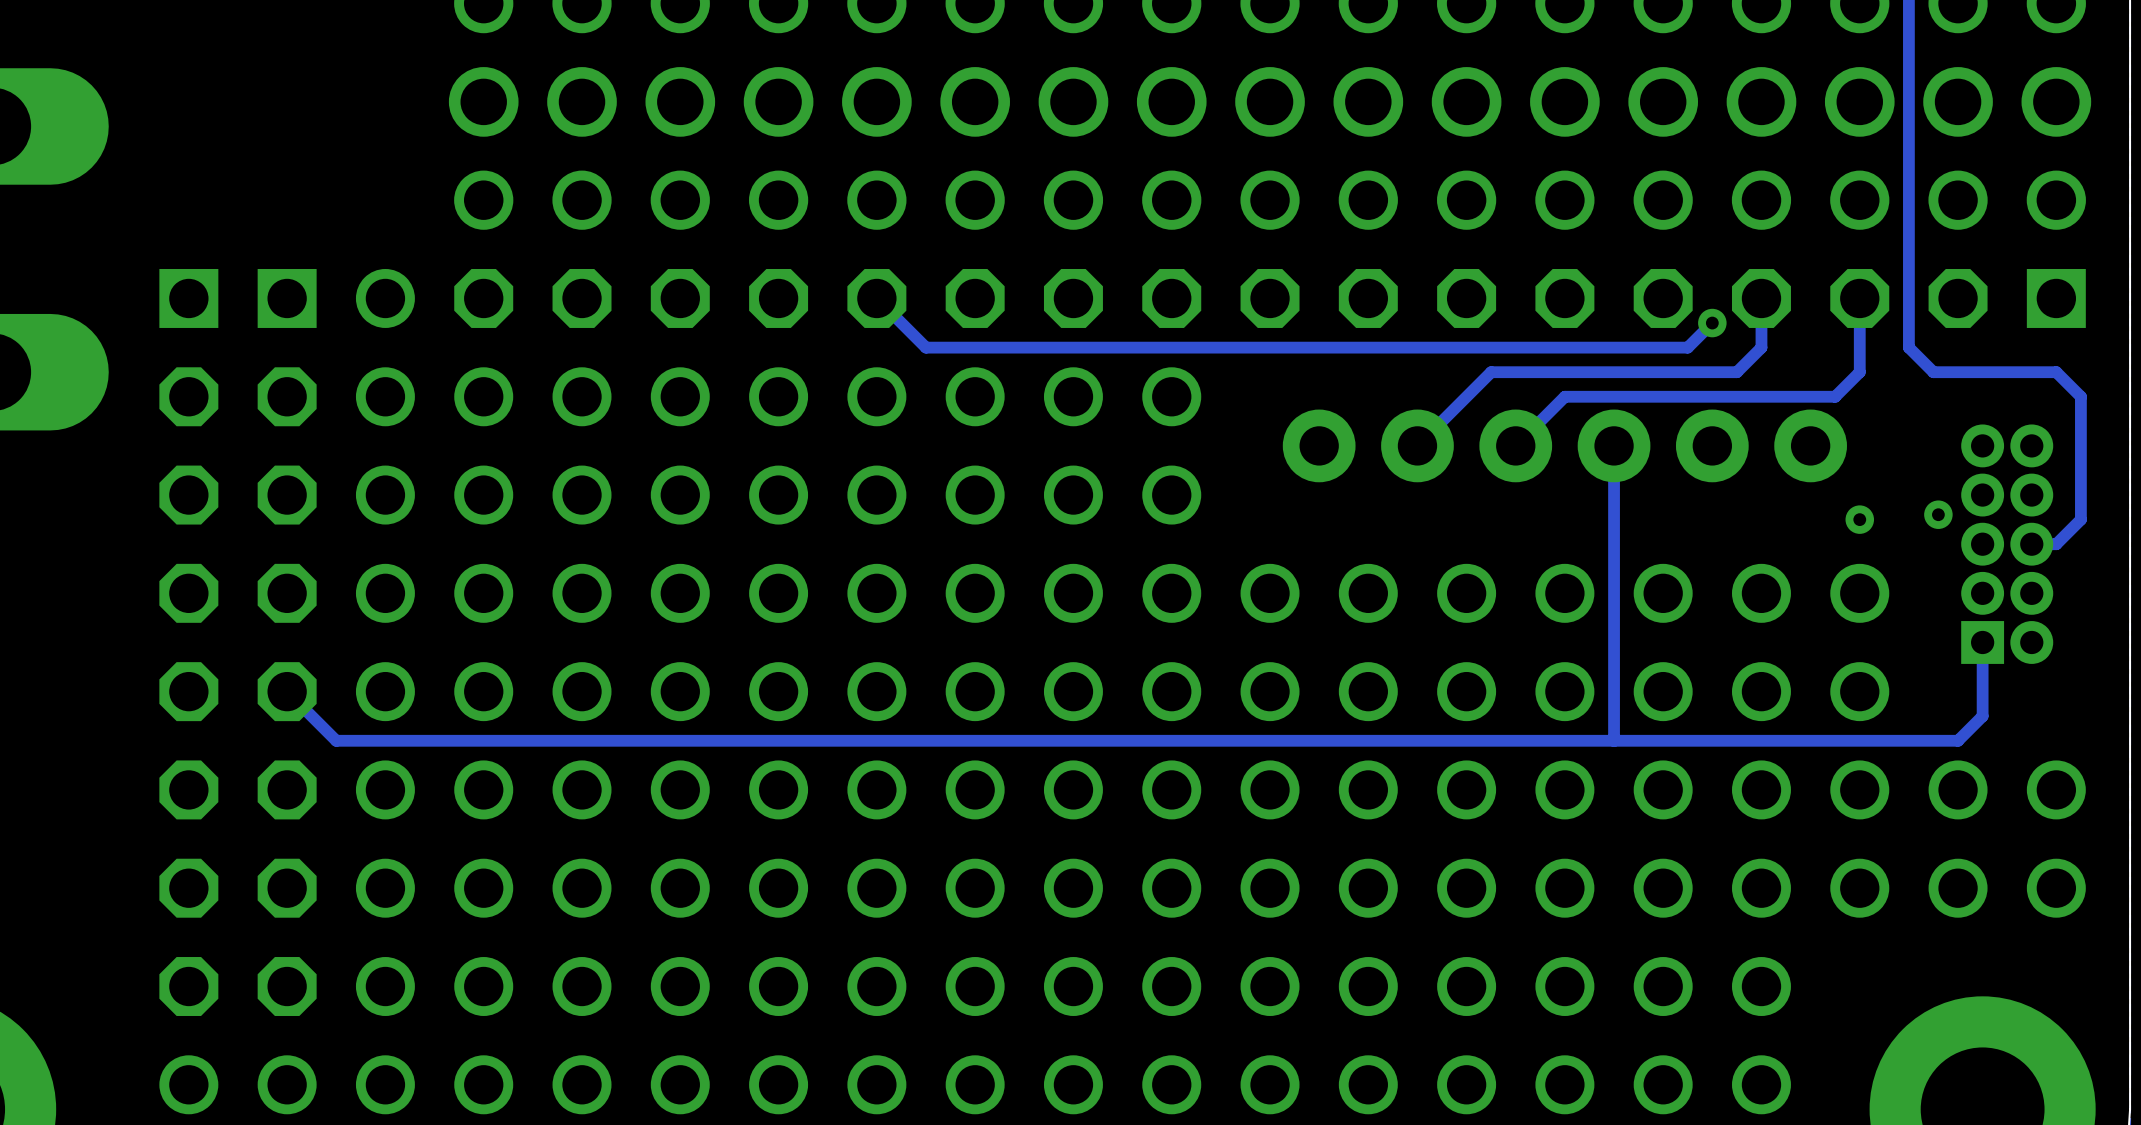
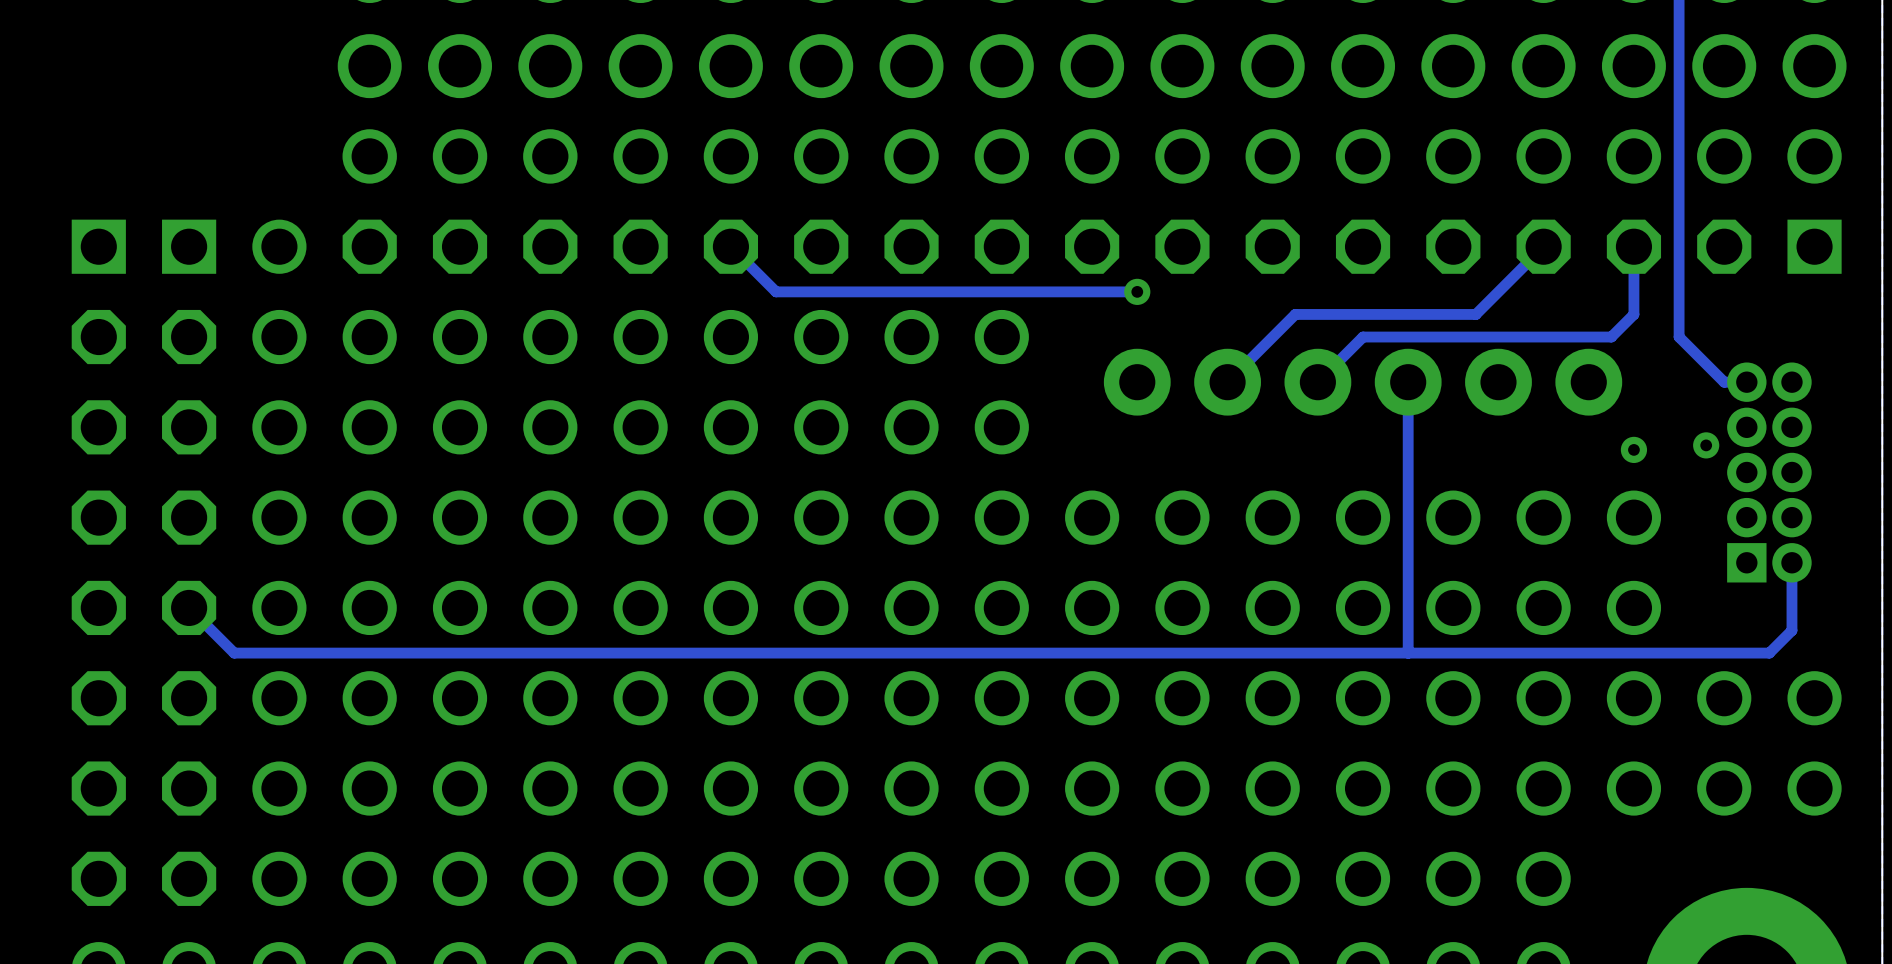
track: (1761, 298) (1761, 347) (1736, 372) (1687, 372) -> (1543, 246) (1475, 314)
track: (1712, 323) (1687, 347) (1319, 347) -> none
via: (1712, 323) -> none
via: none -> (1137, 291)
track: (1908, 347) (1933, 372) (2056, 372) (2080, 396) (2080, 519) (2056, 544) (2031, 544) -> (1679, 291) (1679, 337) (1724, 382) (1746, 382)
track: (1982, 642) (1982, 716) (1958, 740) -> (1791, 562) (1791, 630) (1769, 653) (1724, 653)

